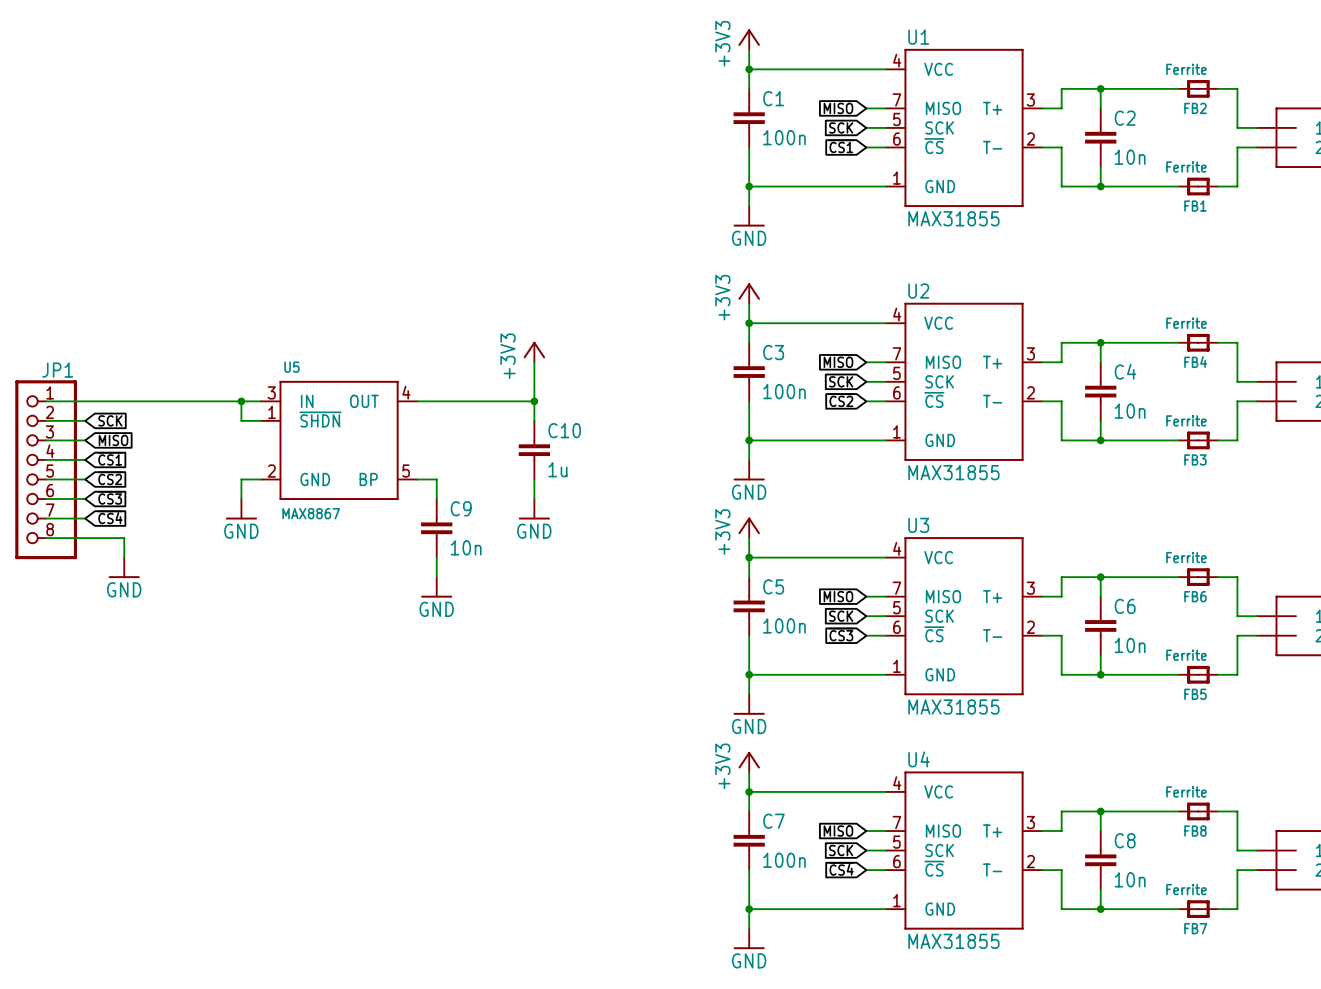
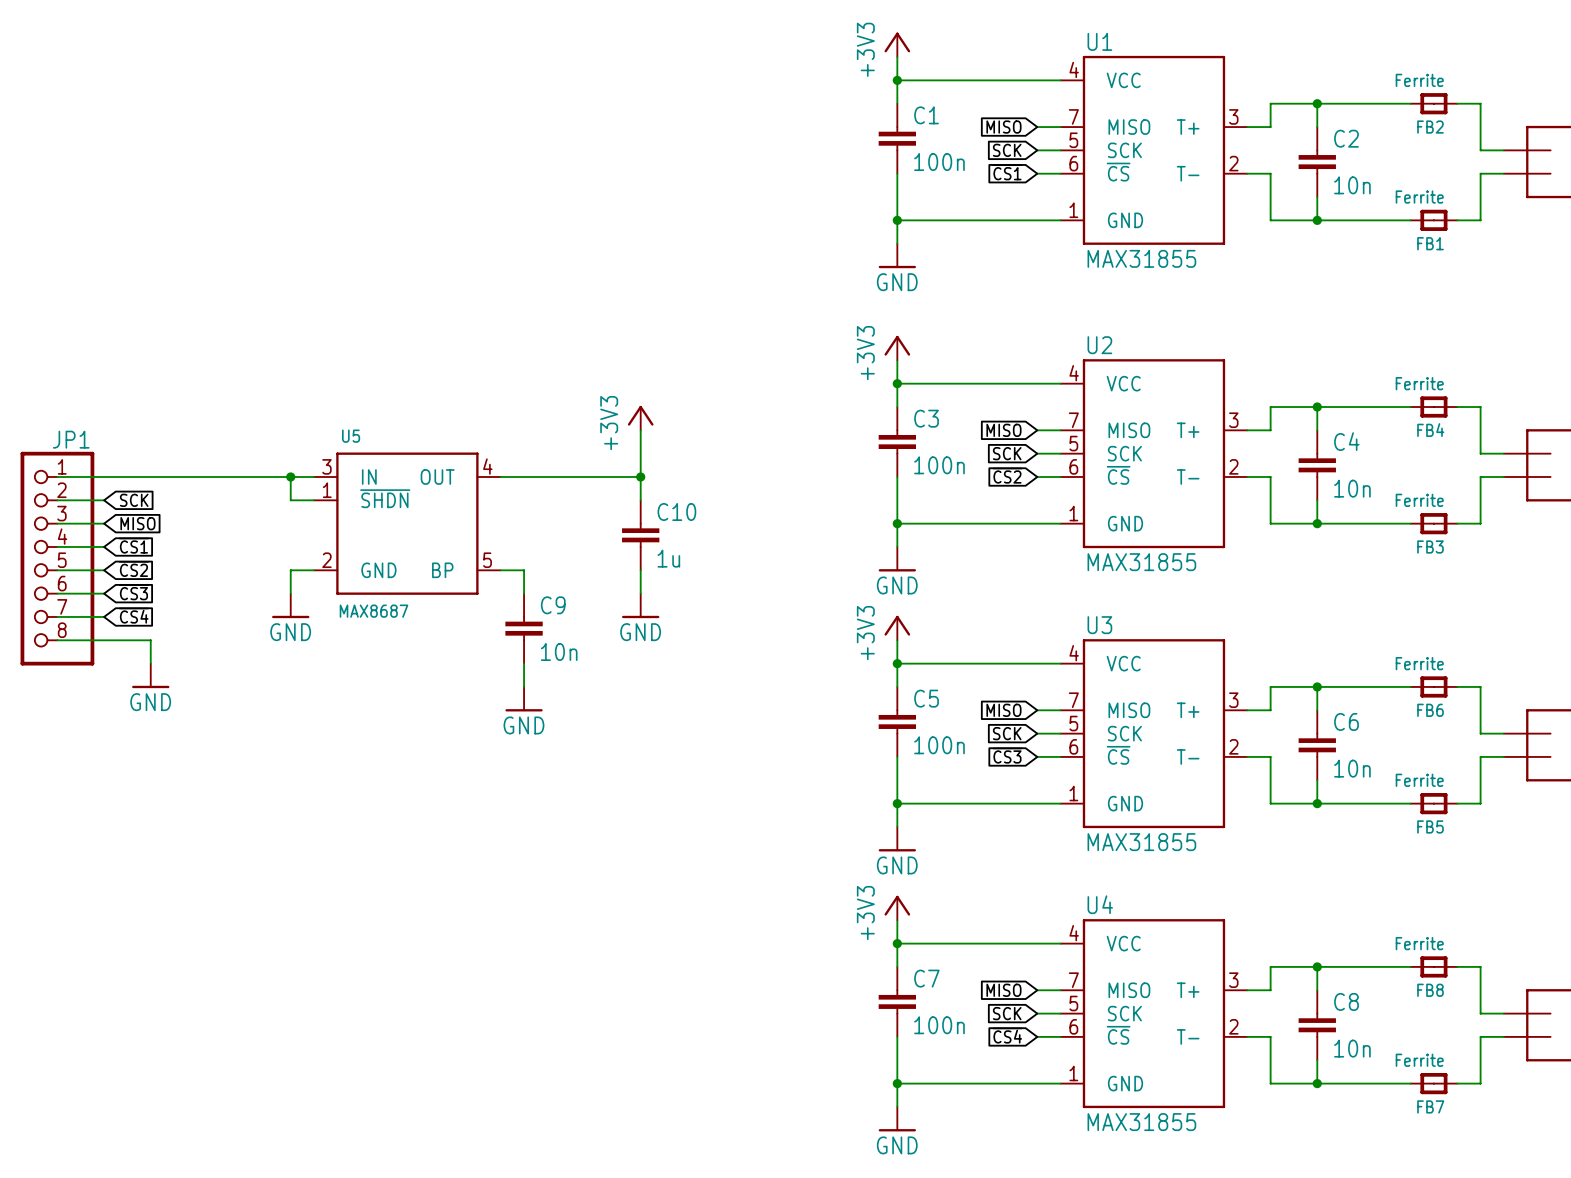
U5 value: MAX8867 (311, 513) -> MAX8687 (374, 611)

